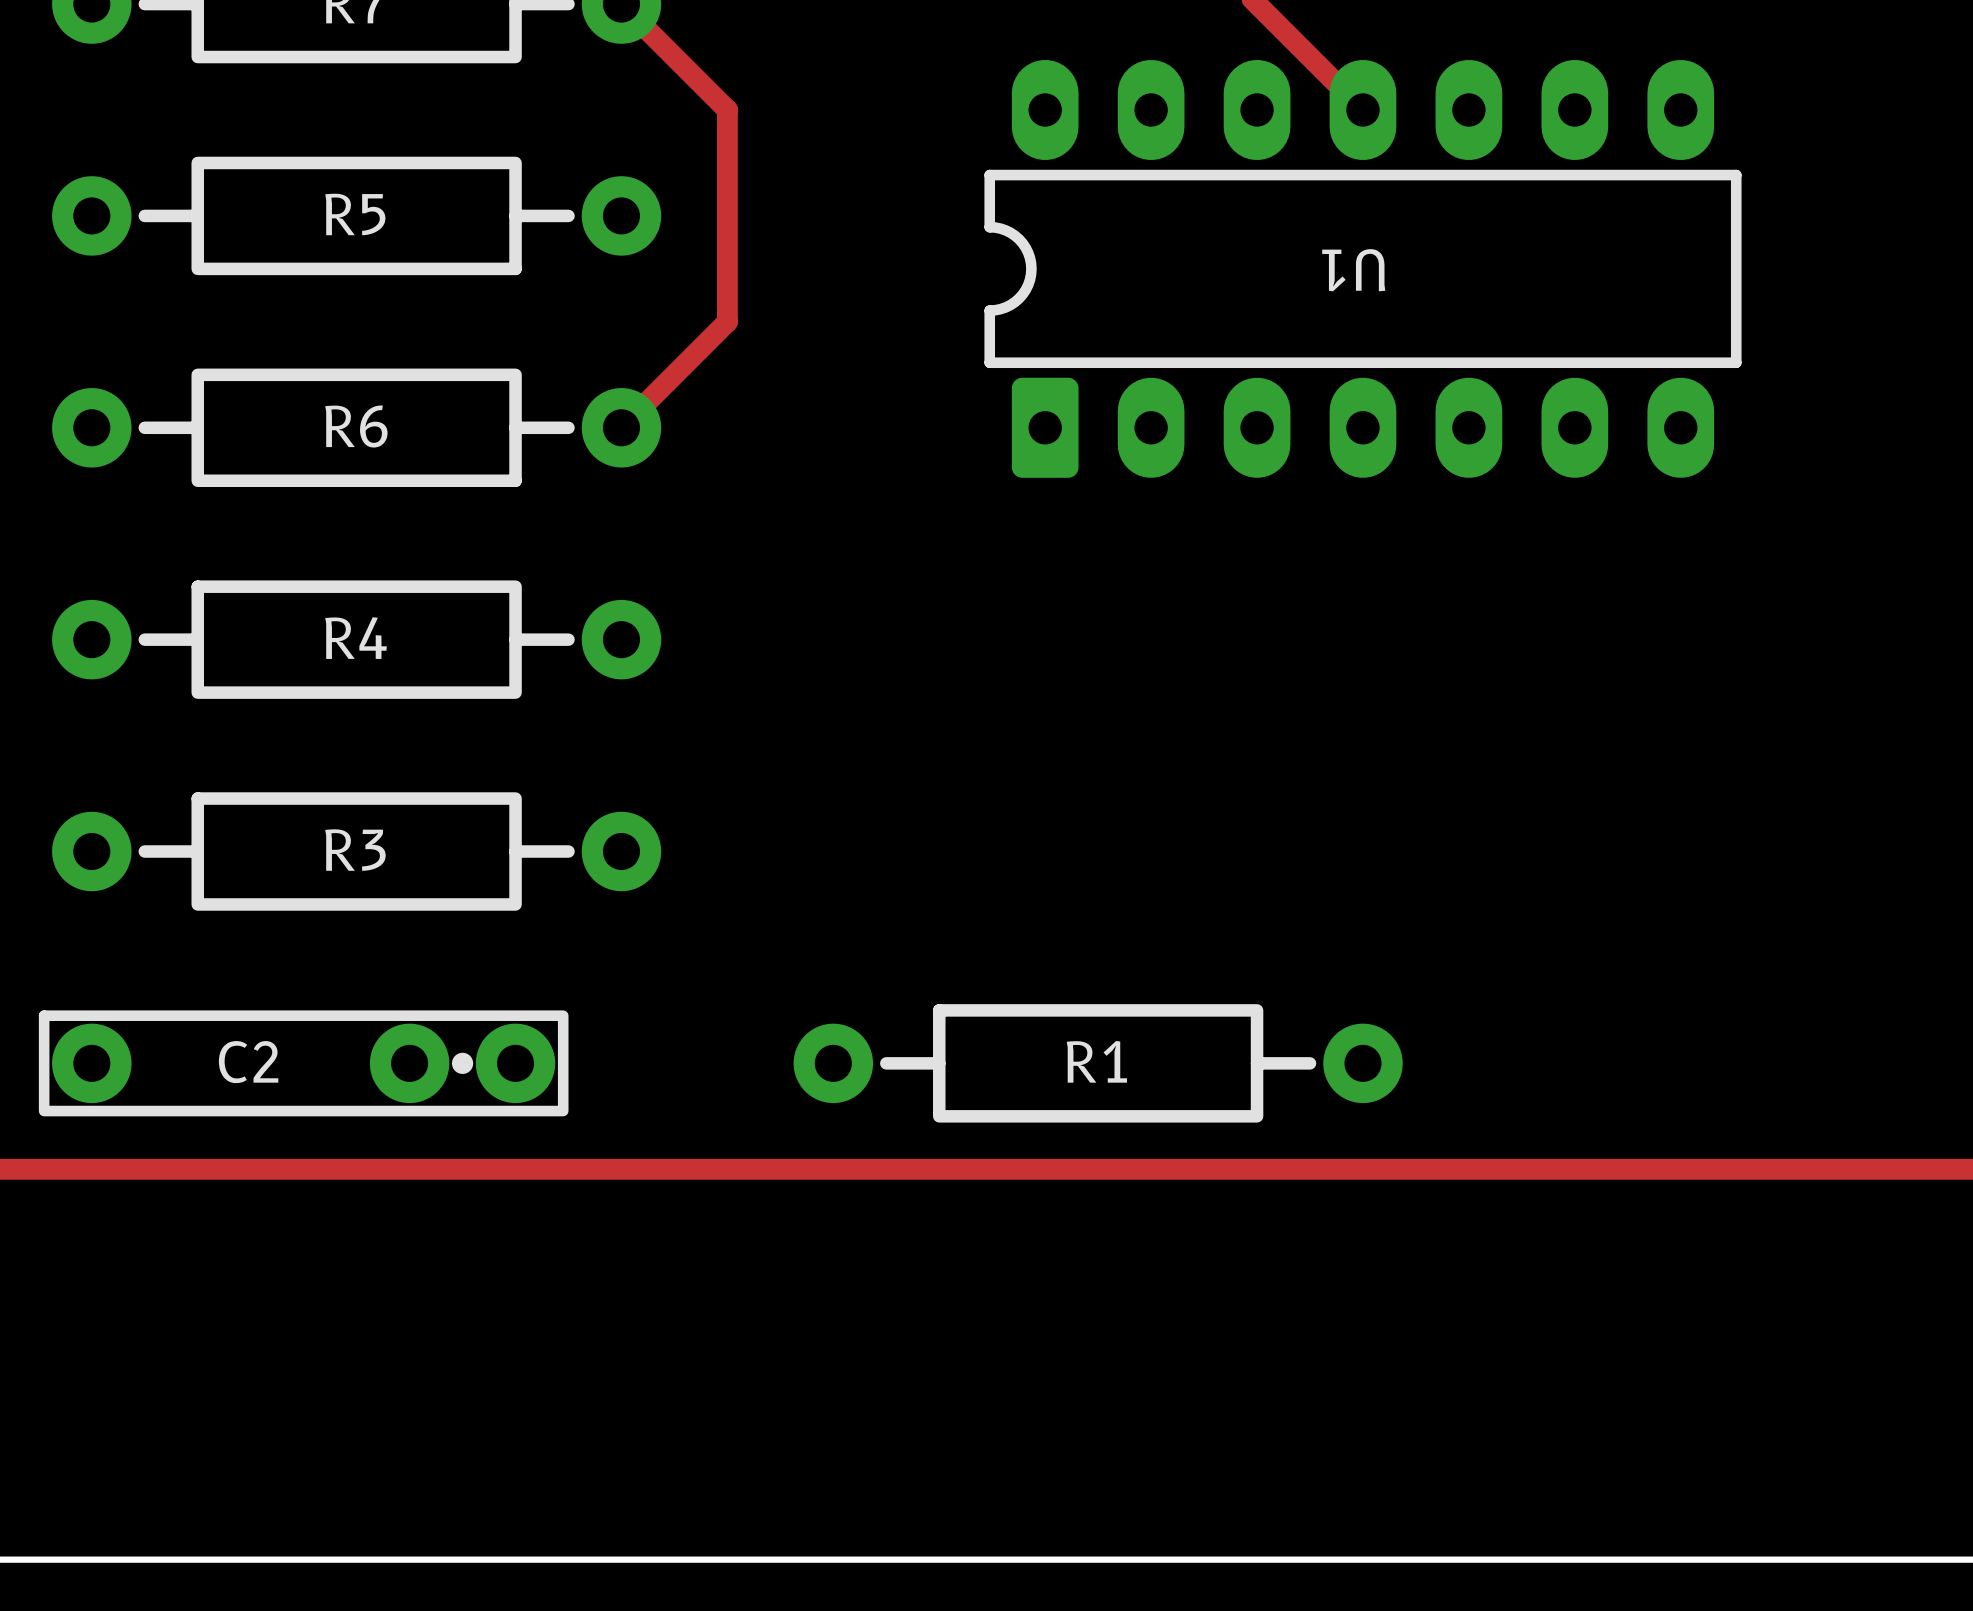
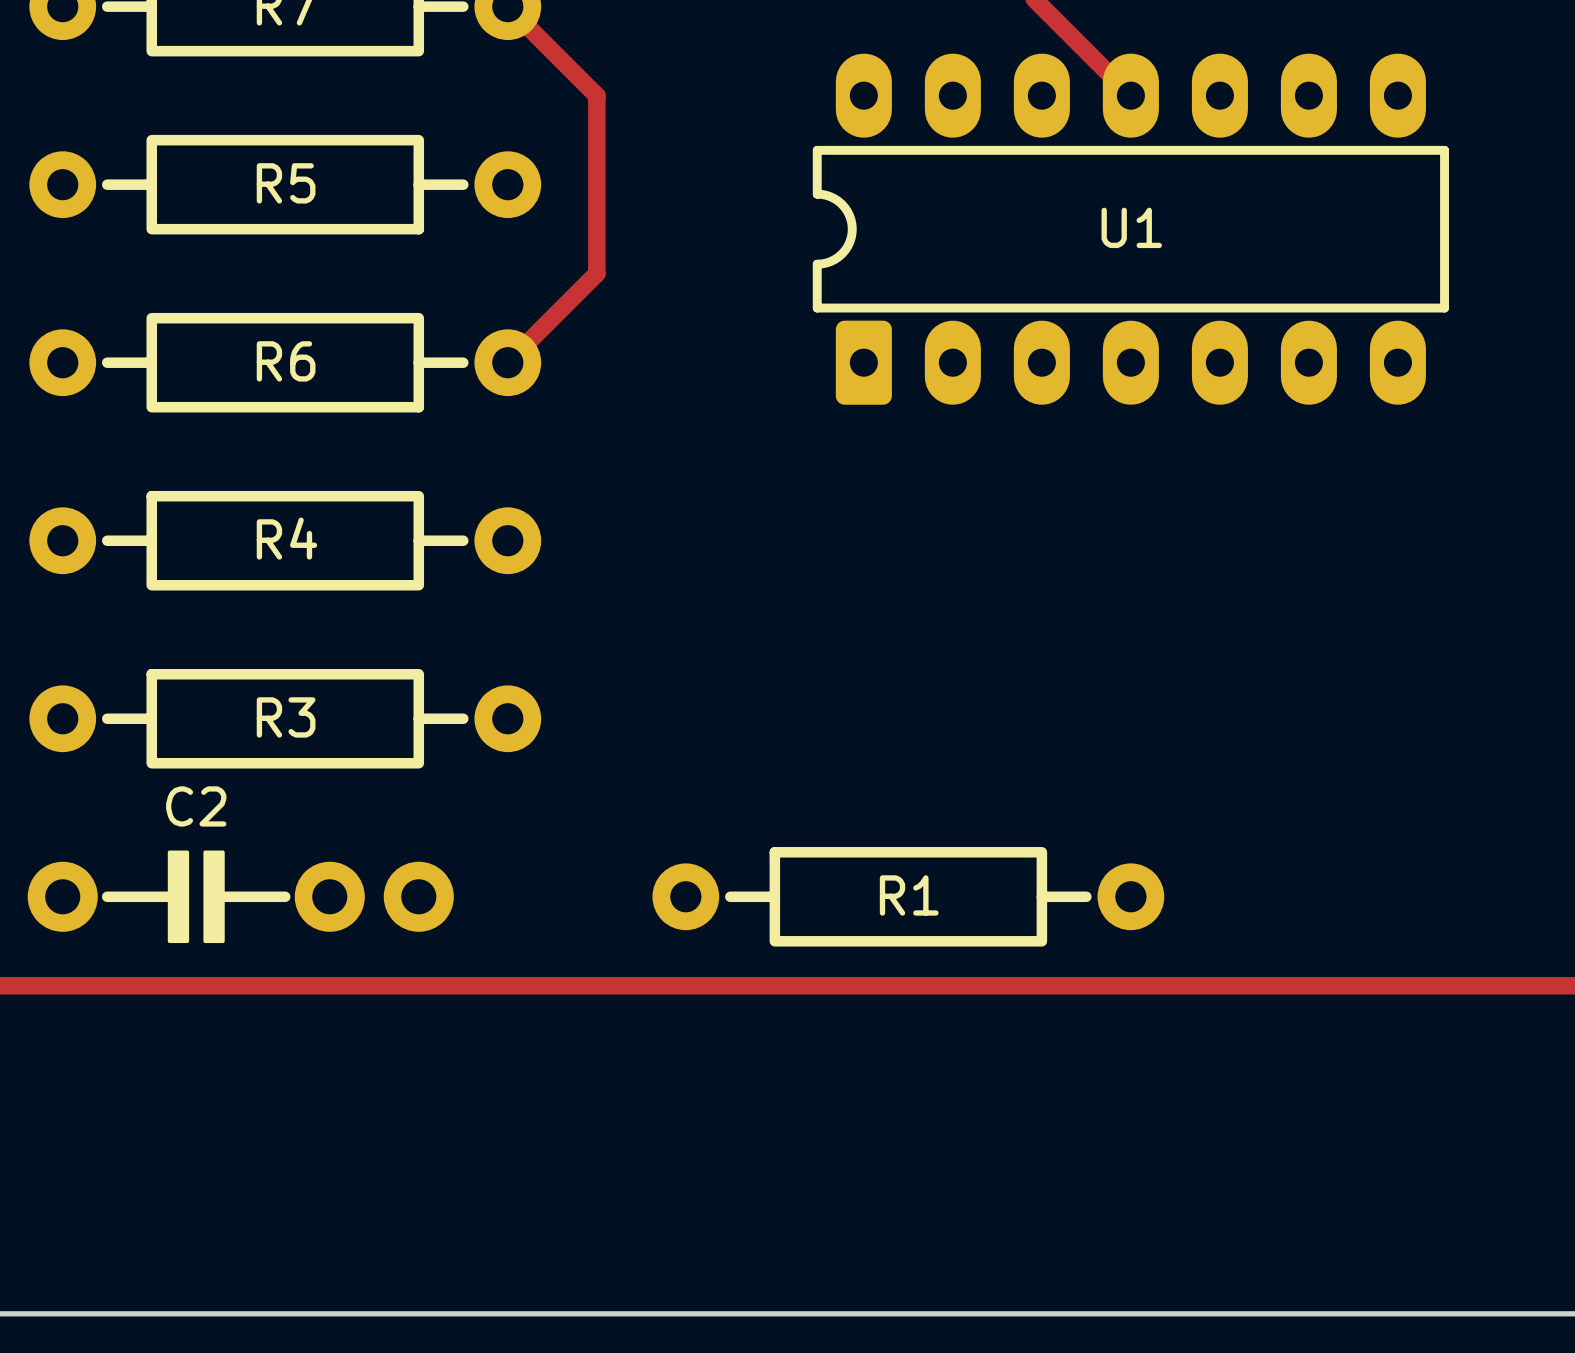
U1 name rotation: 0° (1353, 270) -> 180° (1131, 227)
C2 footprint: [38, 1010, 569, 1117] -> [27, 850, 454, 944]
C2 name position: C2 (248, 1062) -> C2 (196, 806)

